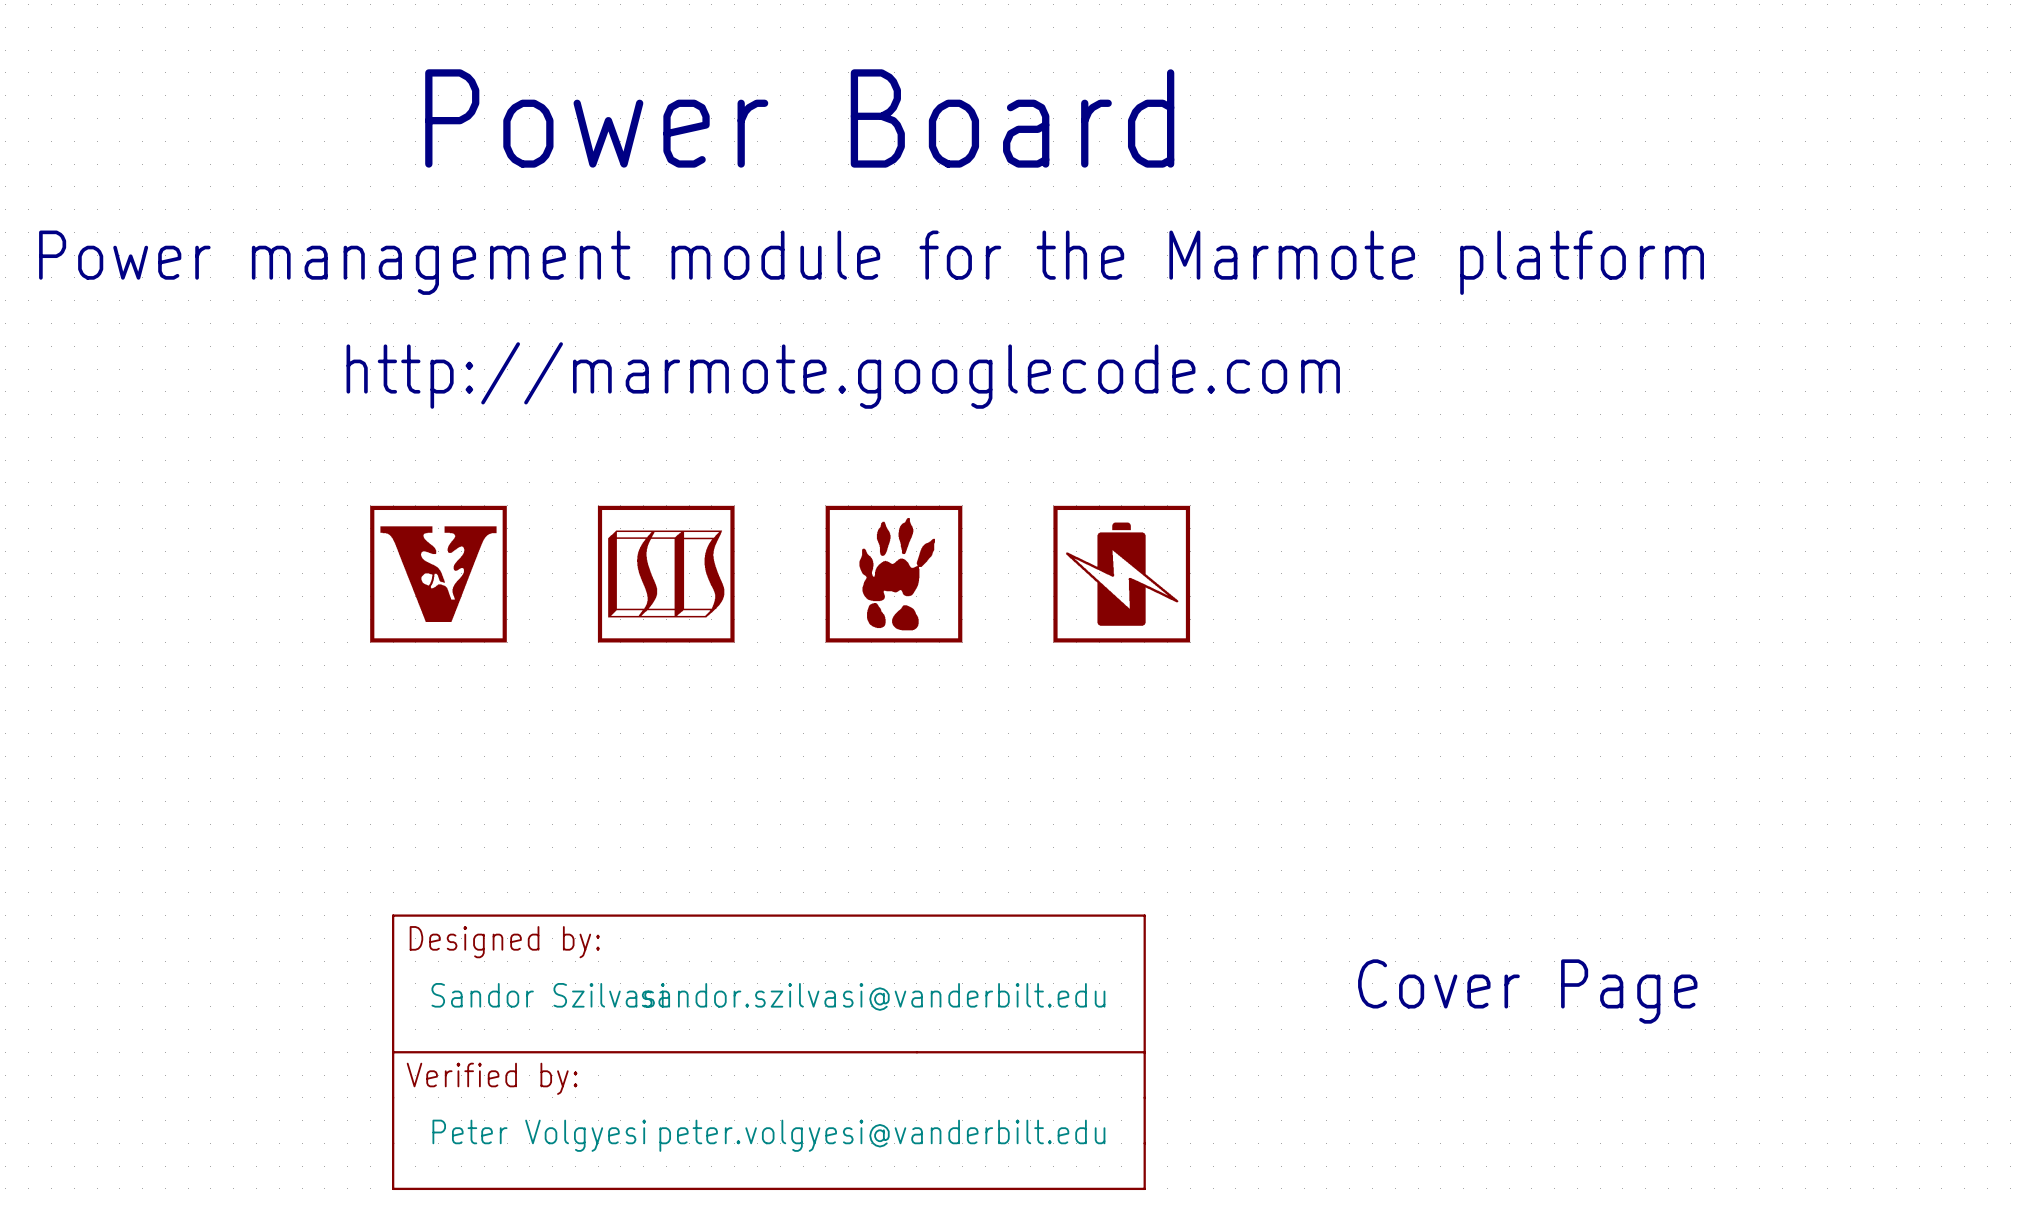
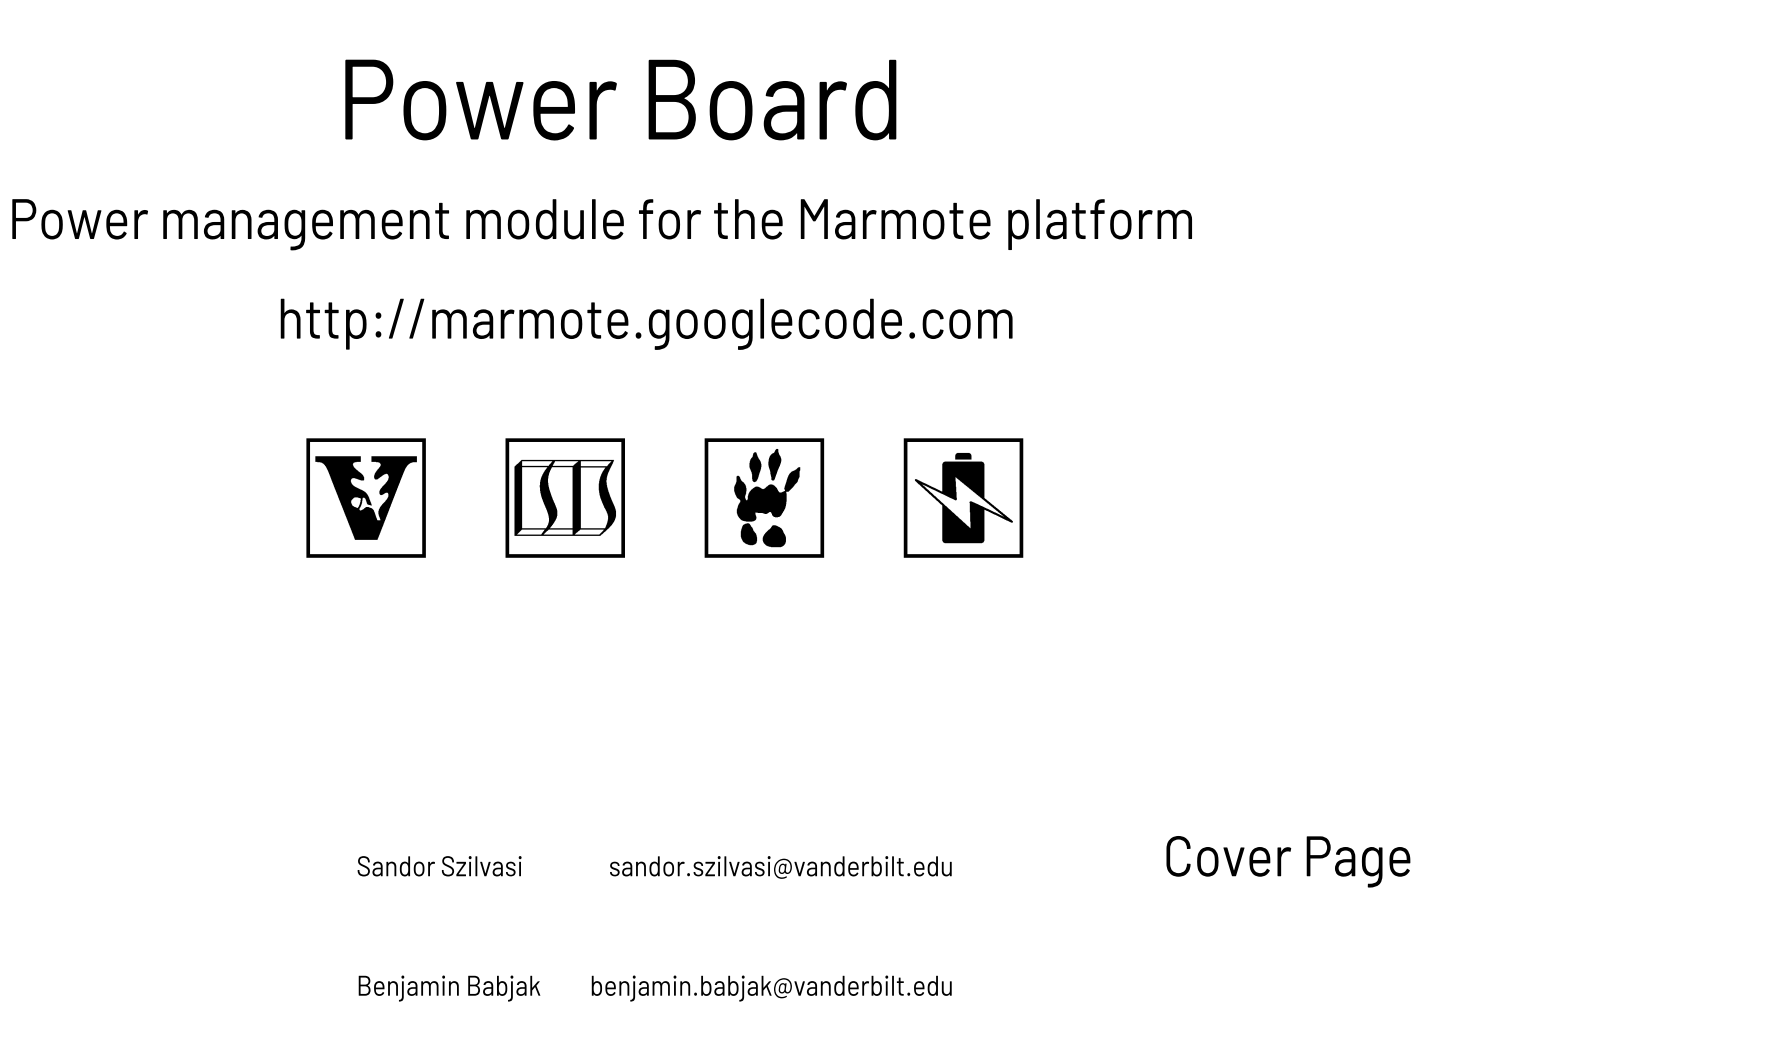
part: (768, 1052) -> none
text: Peter Volgyesi (539, 1135) -> Benjamin Babjak (449, 988)
text: peter.volgyesi@vanderbilt.edu (882, 1135) -> benjamin.babjak@vanderbilt.edu (771, 988)

